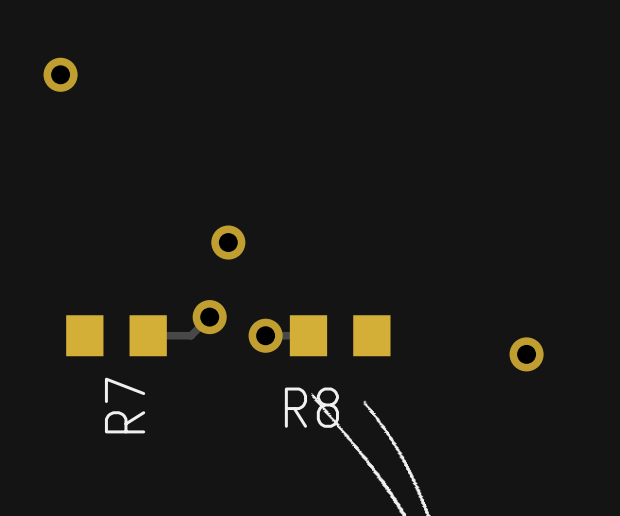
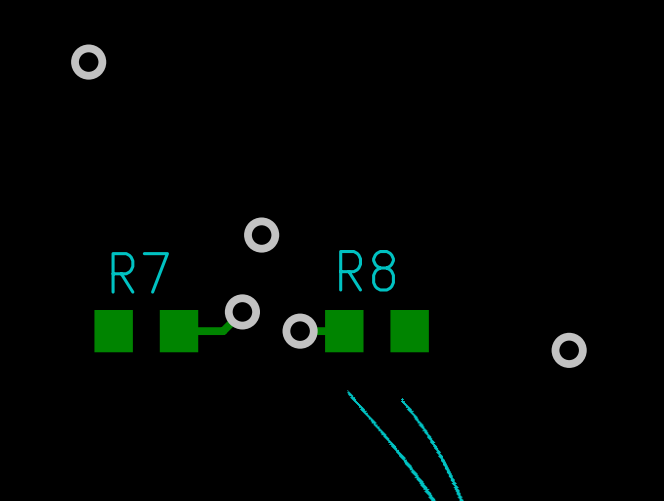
R7 name rotation: 0° (125, 405) -> 90° clockwise (140, 272)
R7 name position: R7 (125, 405) -> R7 (140, 272)
R8 name position: R8 (311, 407) -> R8 (367, 270)

